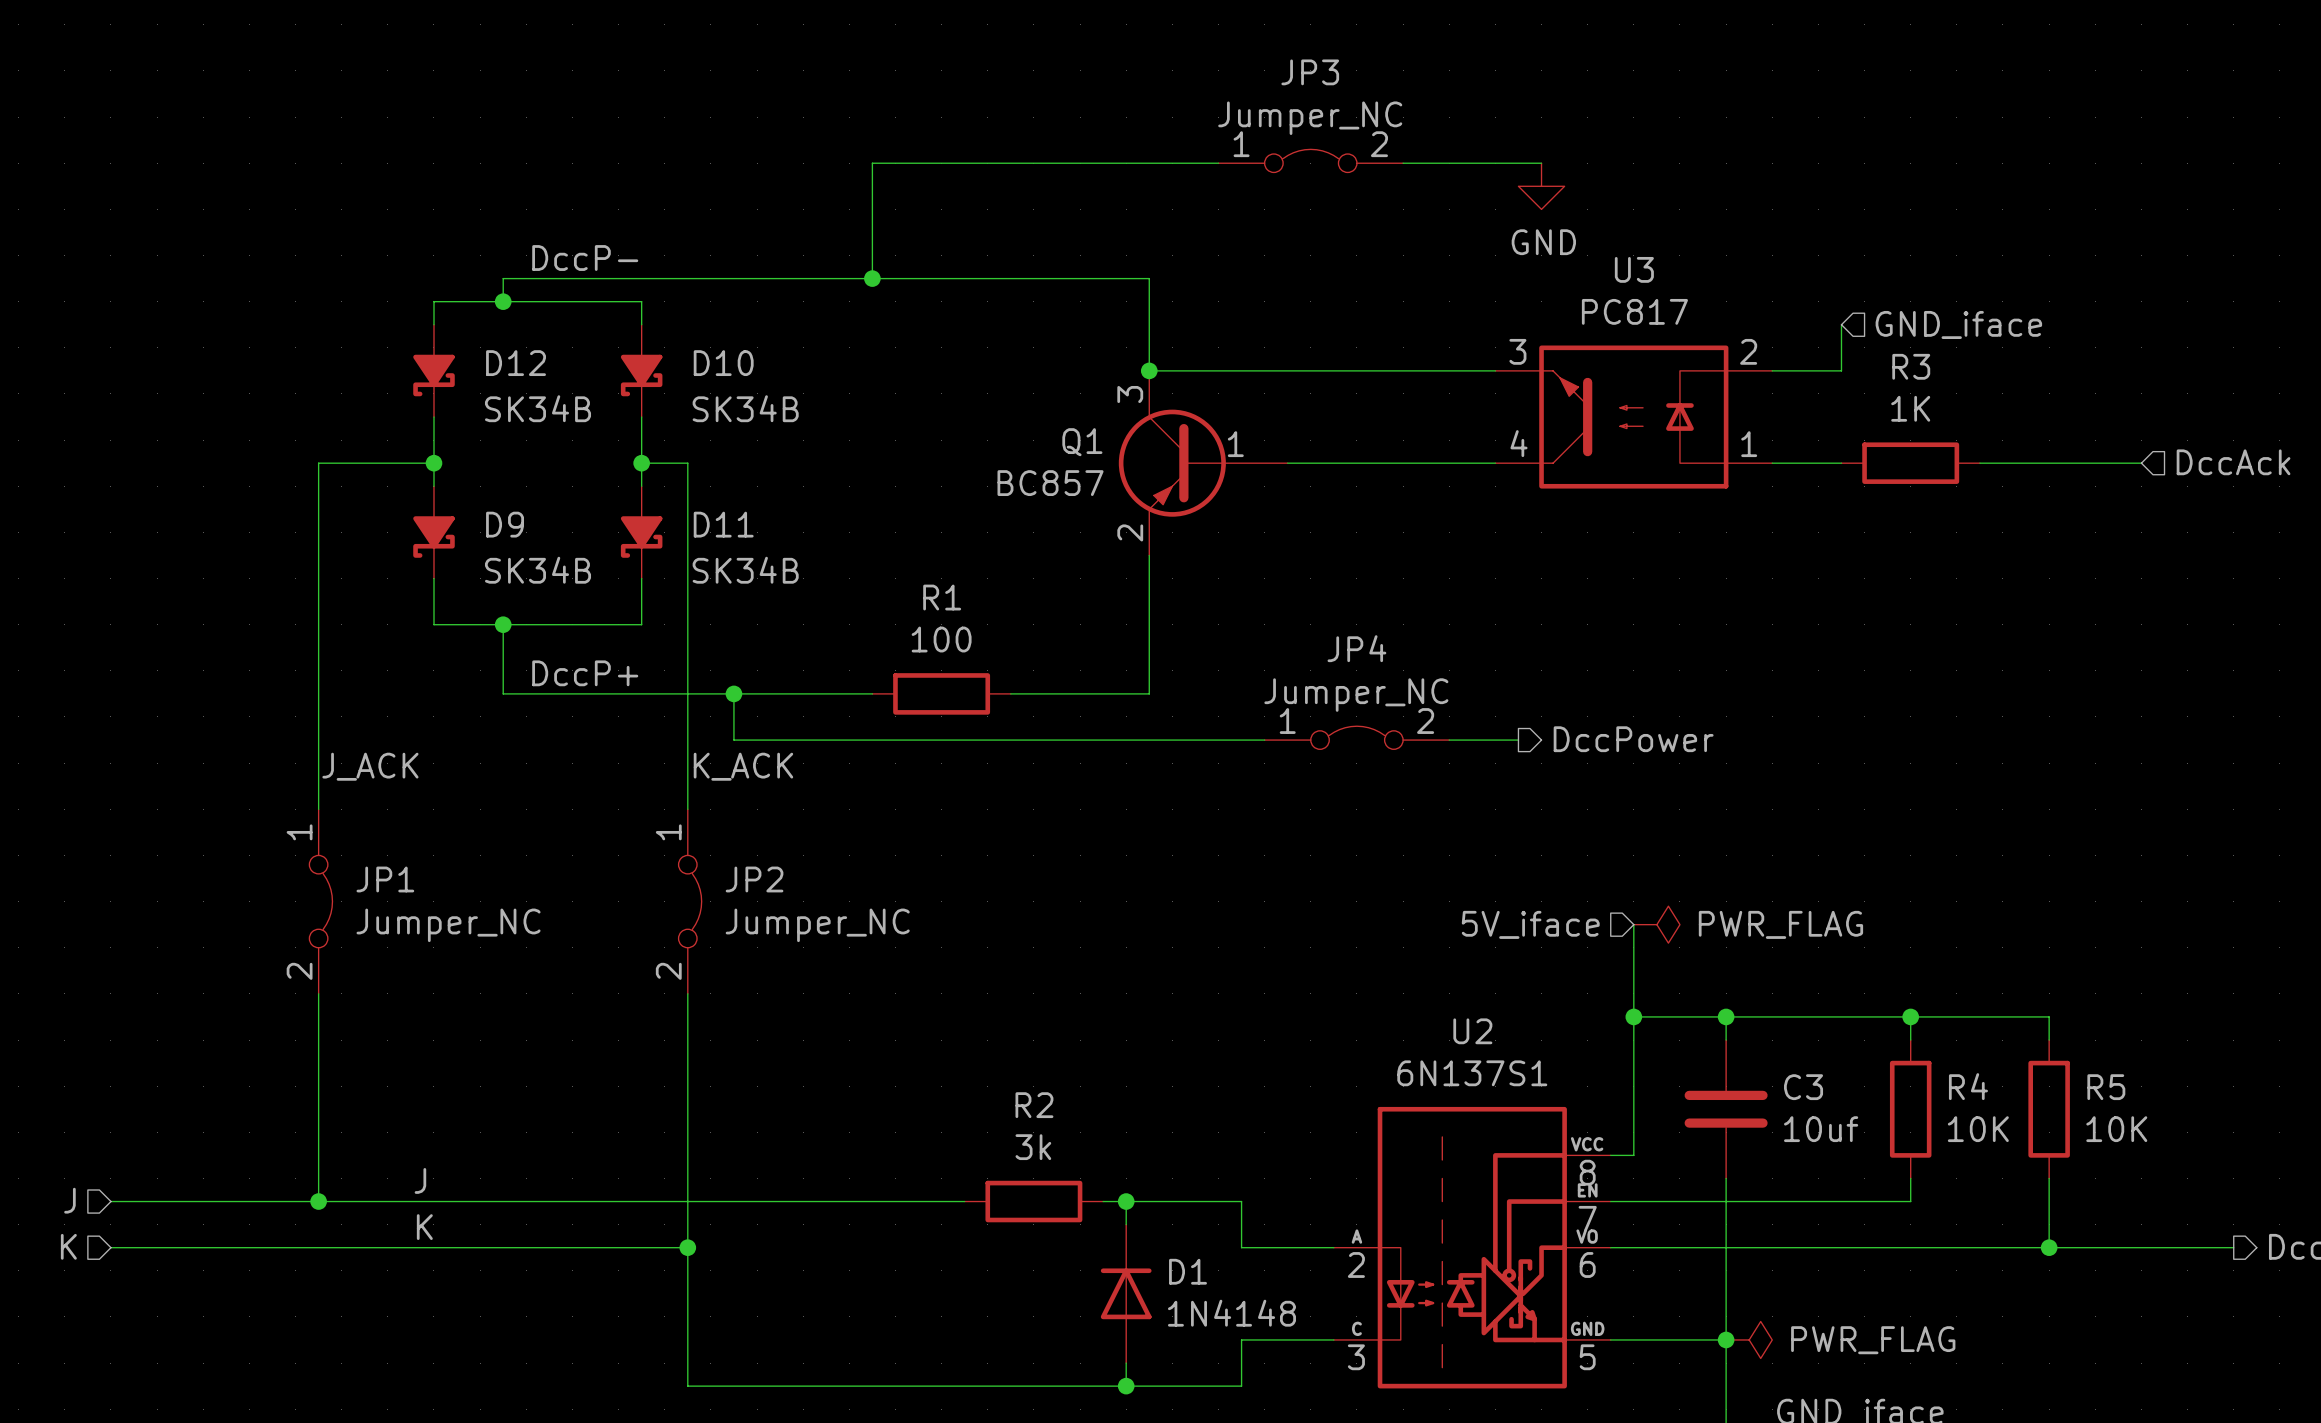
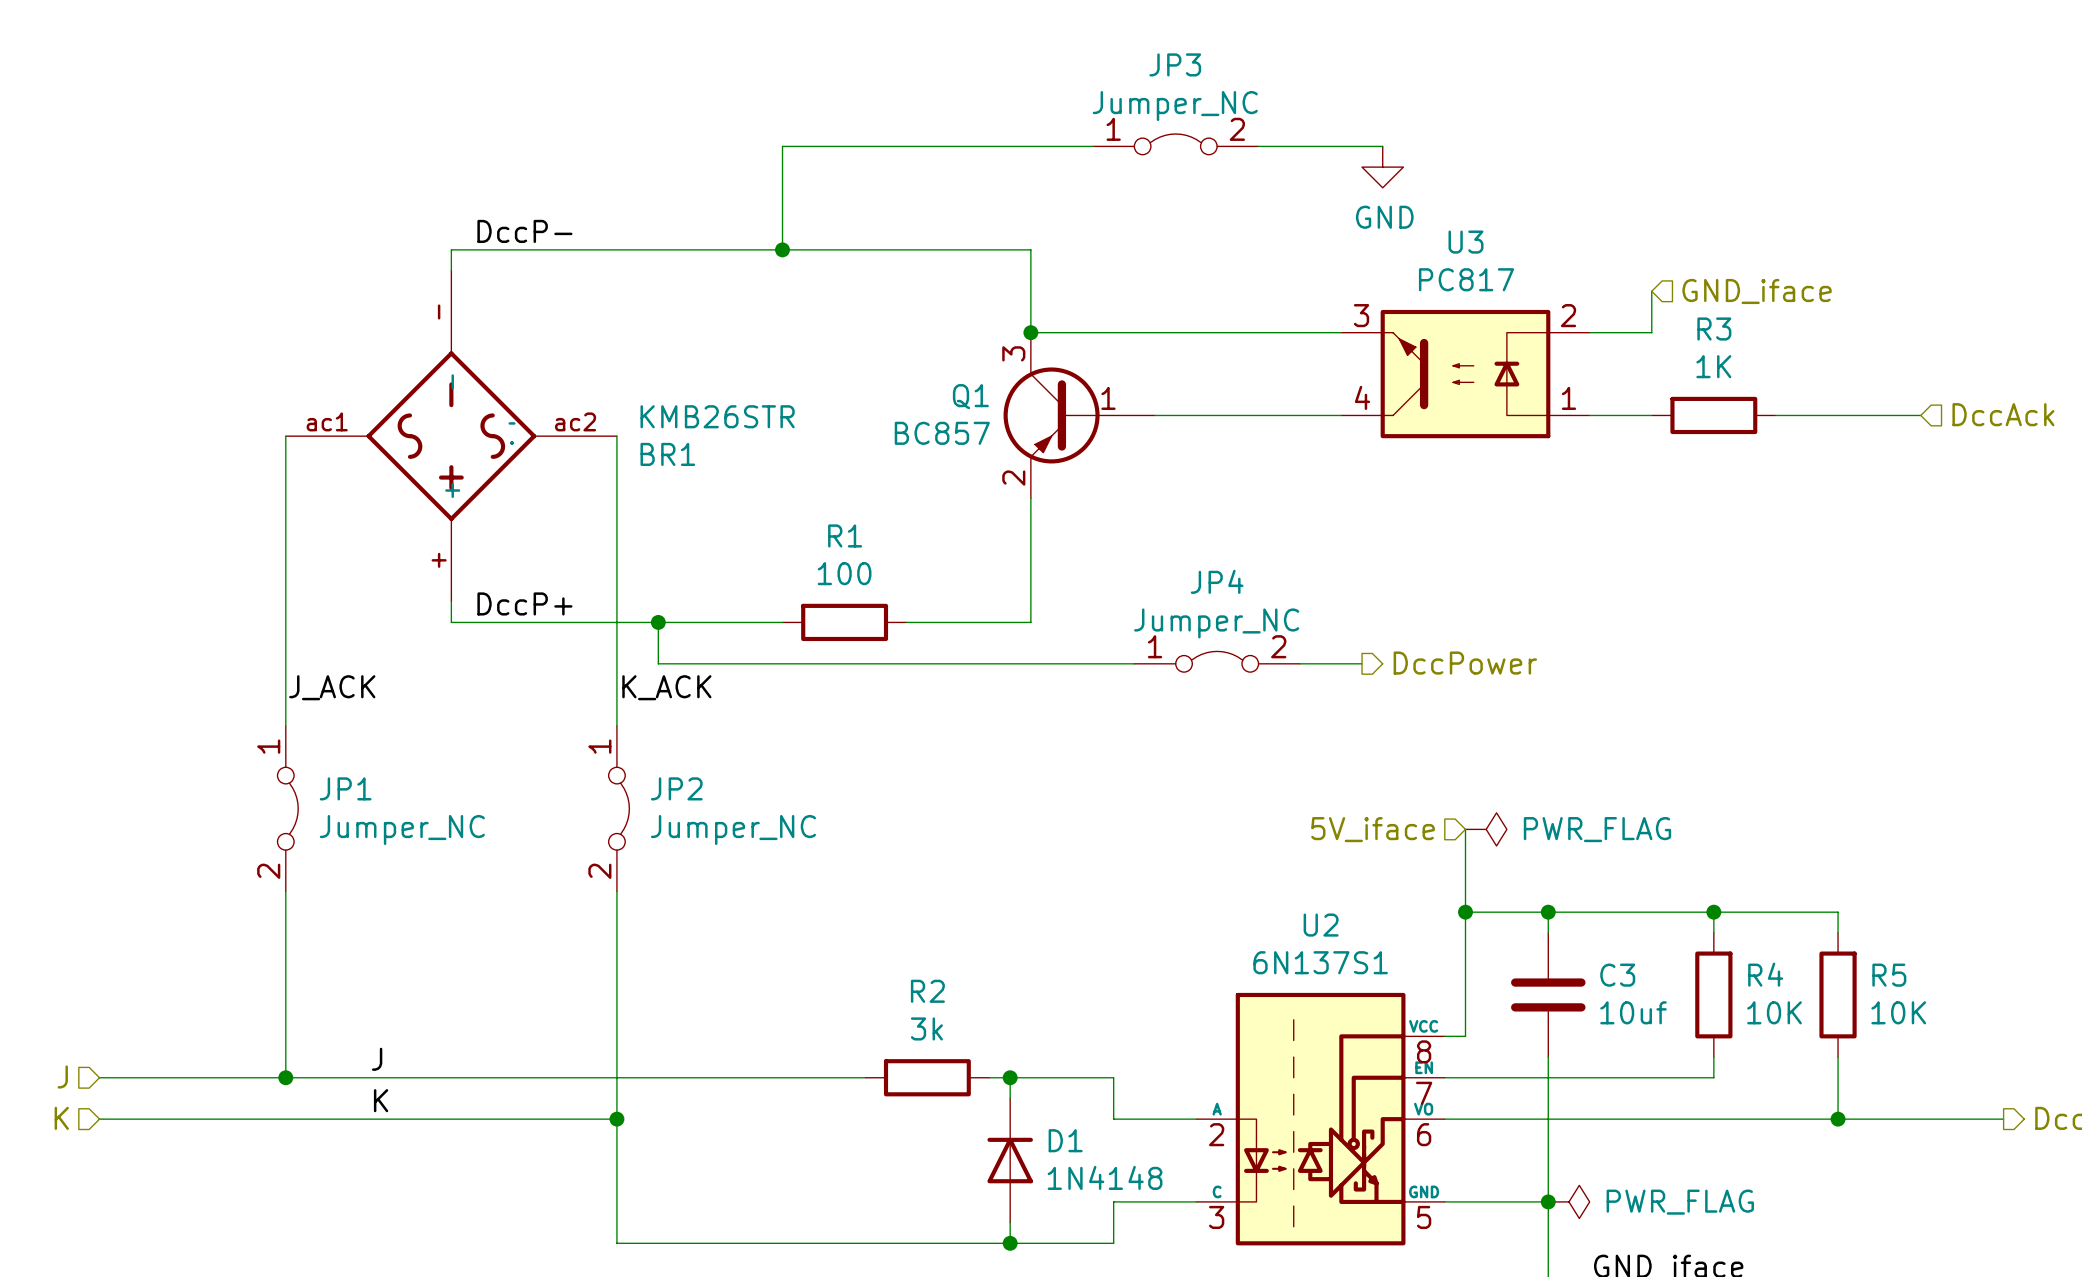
junction: (503, 301) -> none
wire: (433, 324) (433, 301) (641, 301) (641, 324) -> none
D12: SK34B (433, 370) -> none
D10: SK34B (641, 370) -> none
wire: (433, 417) (433, 486) -> none
wire: (641, 417) (641, 486) -> none
wire: (433, 463) (318, 463) (318, 486) -> none
junction: (433, 463) -> none
wire: (641, 463) (687, 463) (687, 486) -> none
junction: (641, 463) -> none
BR1: none -> KMB26STR (451, 436)
D9: SK34B (433, 532) -> none
D11: SK34B (641, 532) -> none
wire: (433, 578) (433, 624) (641, 624) (641, 578) -> none
junction: (503, 624) -> none

